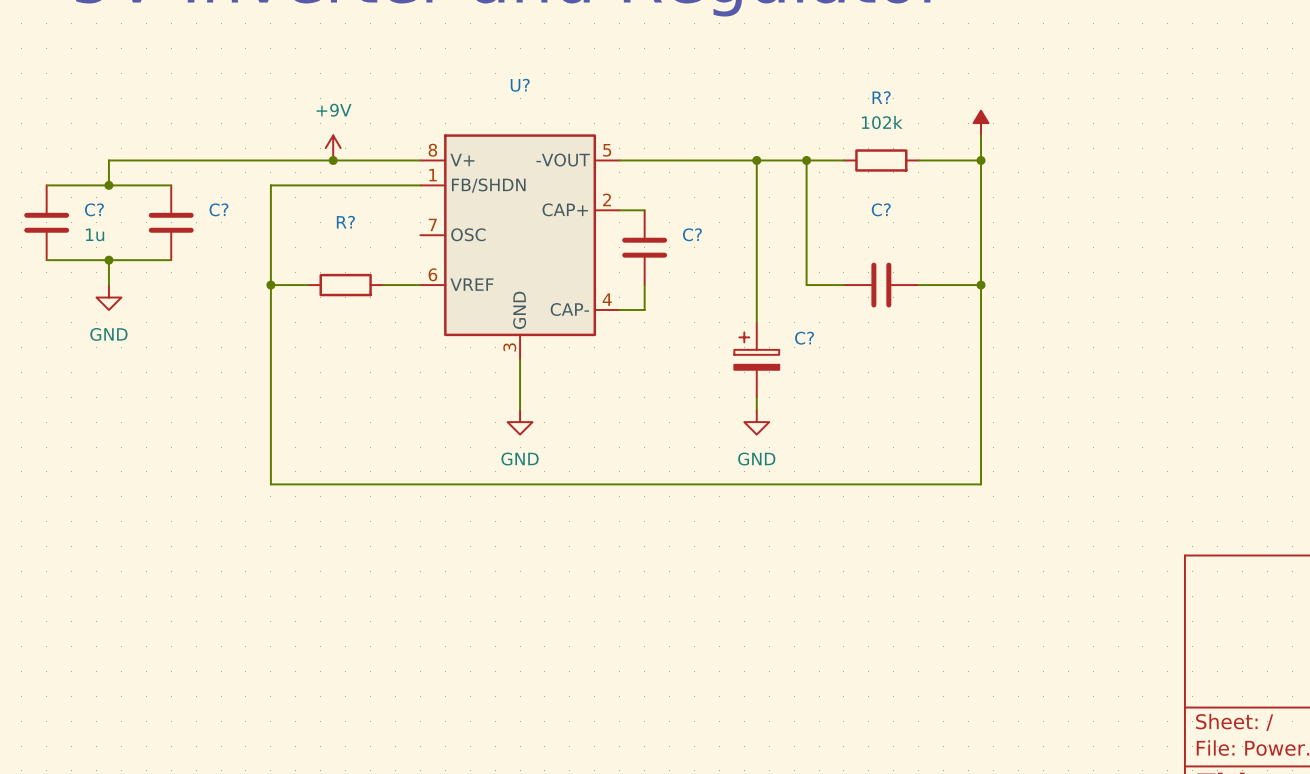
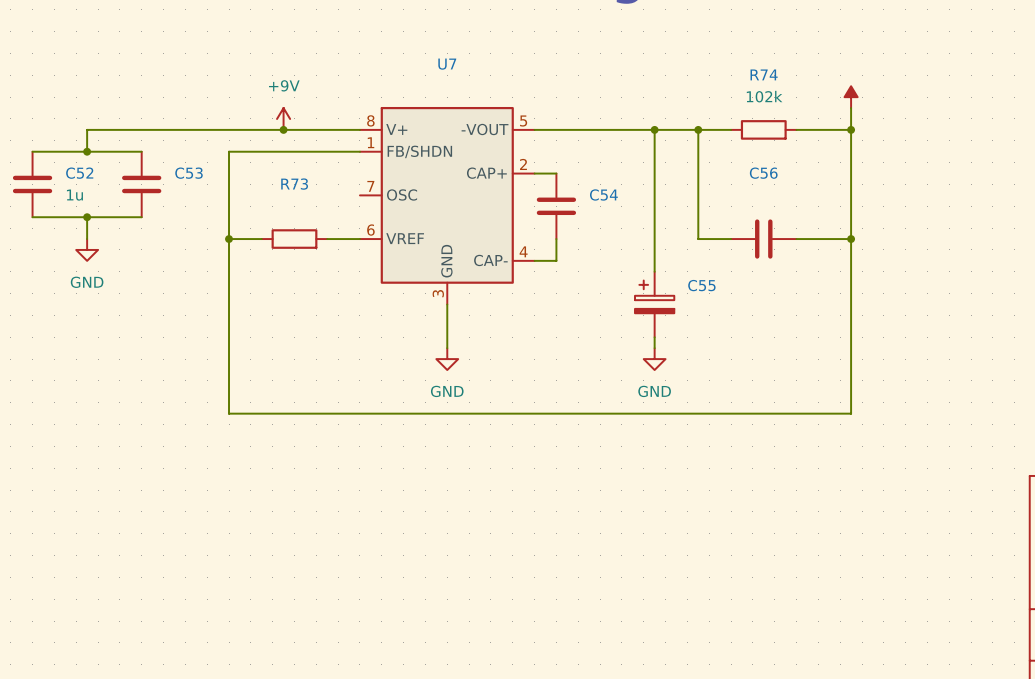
U? name: U? (520, 85) -> U7 (447, 64)
R? name: R? (881, 97) -> R74 (764, 74)
C? name: C? (94, 209) -> C52 (79, 173)
C? name: C? (218, 209) -> C53 (189, 173)
C? name: C? (881, 209) -> C56 (763, 173)
R? name: R? (345, 222) -> R73 (294, 184)
C? name: C? (692, 234) -> C54 (603, 194)
C? name: C? (804, 338) -> C55 (701, 285)

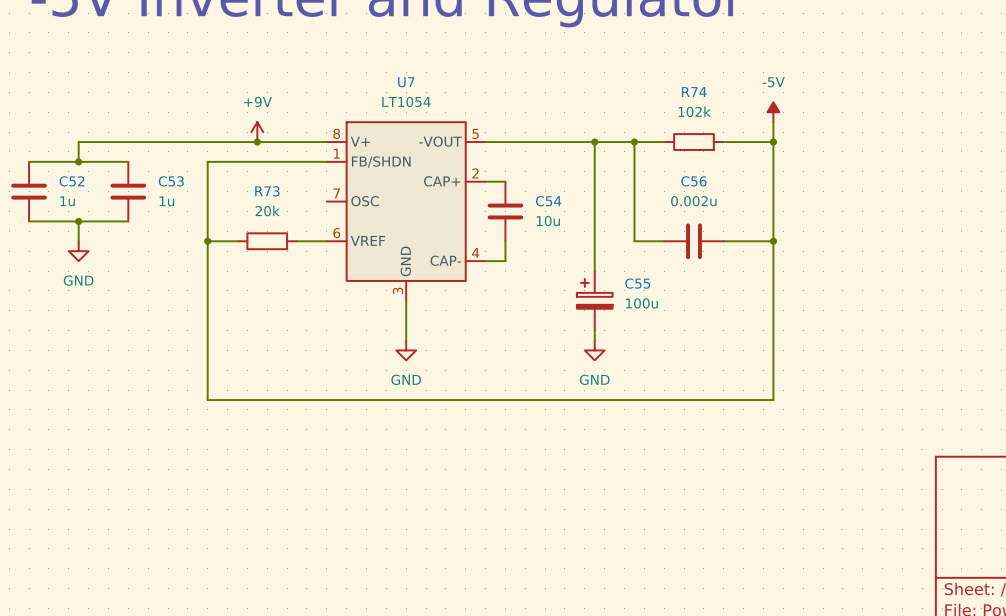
power symbol text: none -> -5V (773, 82)
U7 value: none -> LT1054 (406, 101)
C56 value: none -> 0.002u (693, 201)
C53 value: none -> 1u (166, 201)
R73 value: none -> 20k (267, 211)
C54 value: none -> 10u (548, 221)
C55 value: none -> 100u (641, 303)

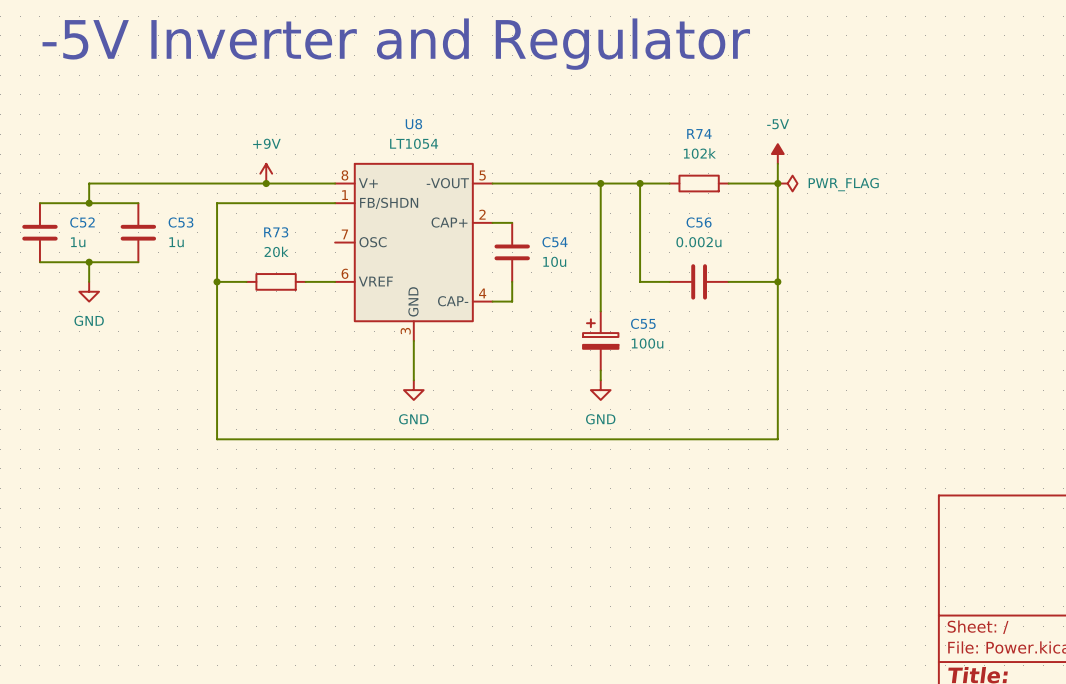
U7 name: U7 (406, 82) -> U8 (413, 124)
power symbol: none -> PWR_FLAG (787, 183)

